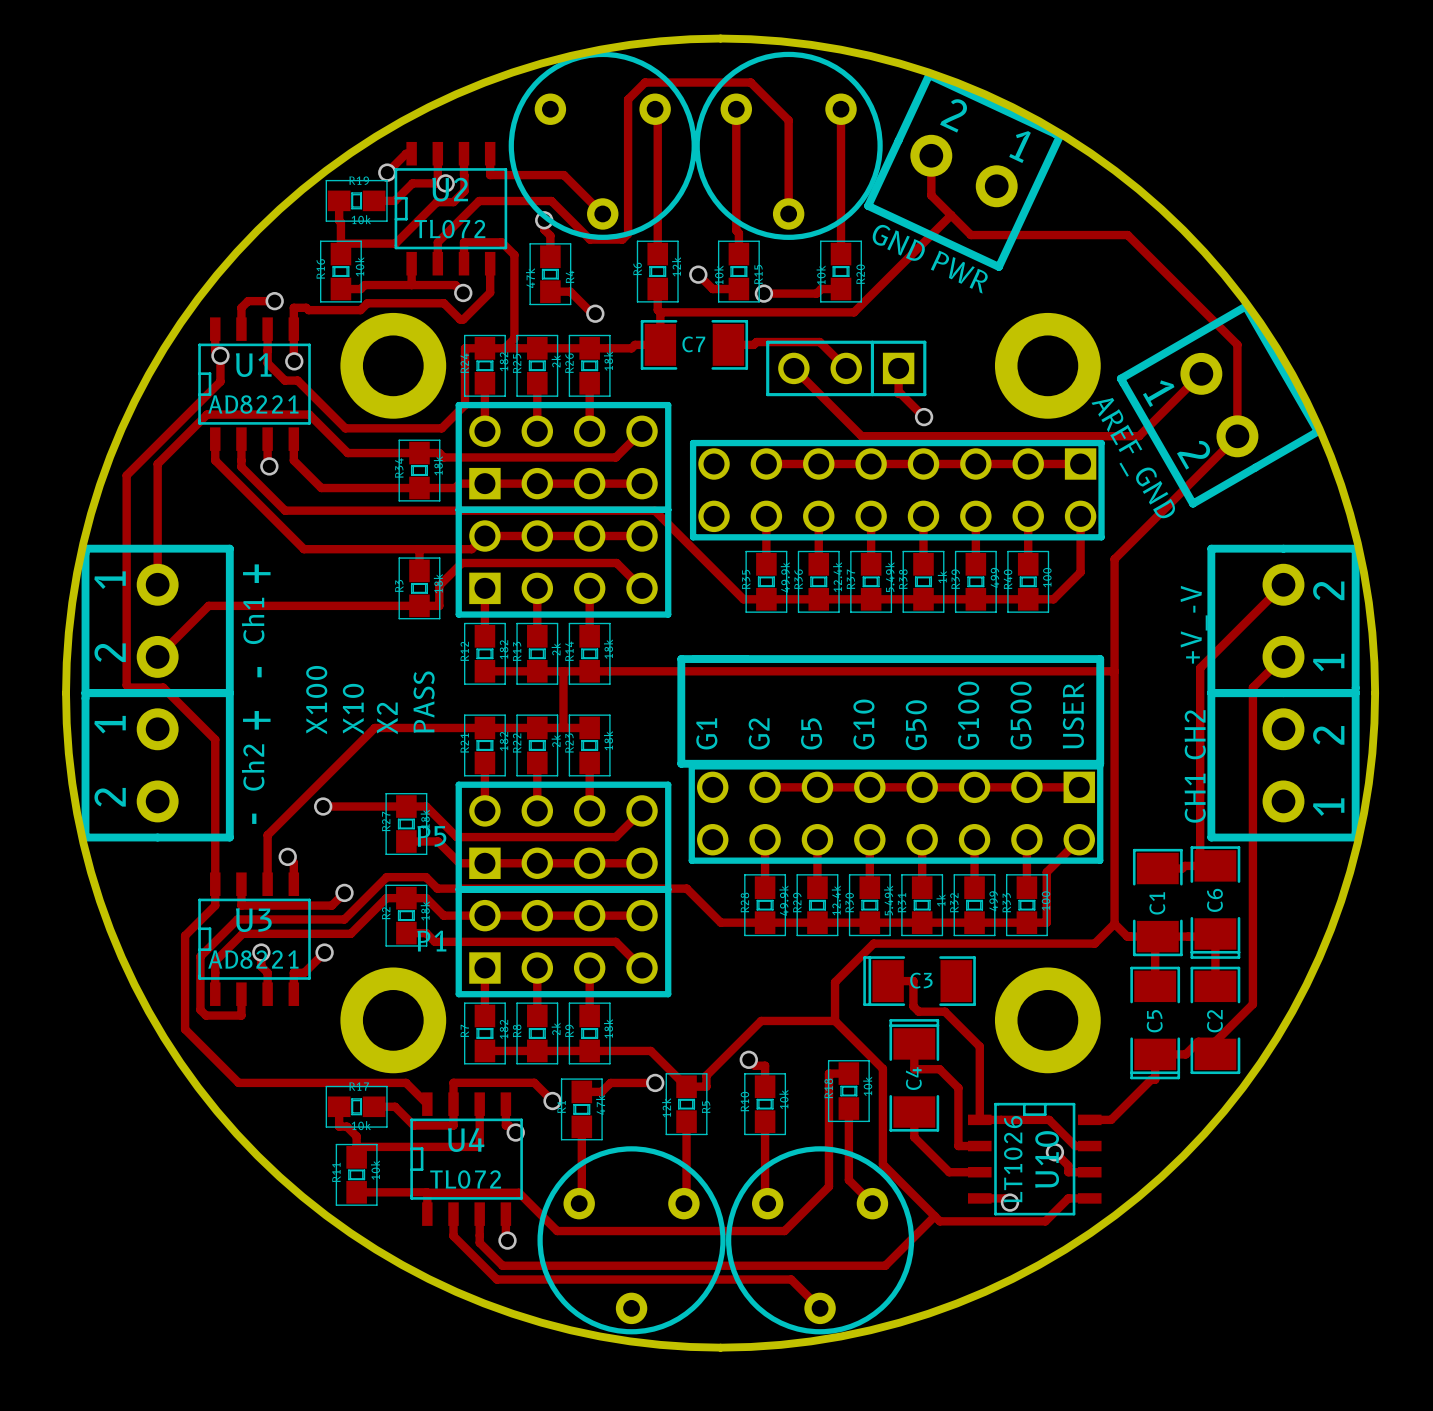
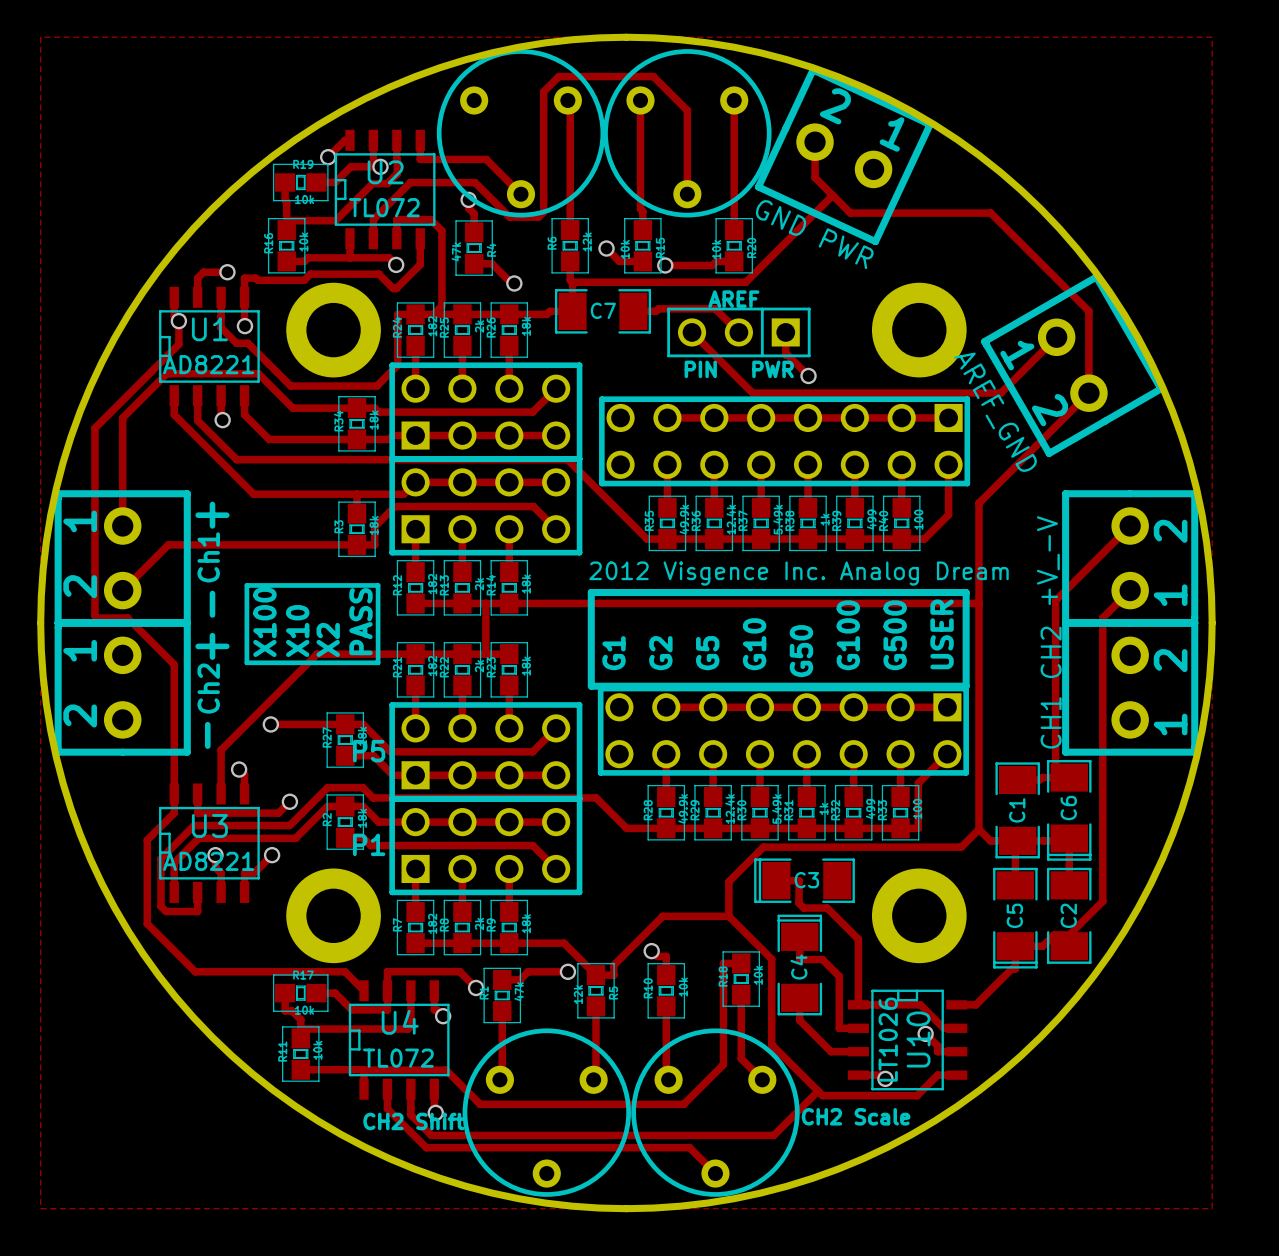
zone outline: none -> (40, 37) (1212, 37) (1212, 1208) (40, 1208) (40, 37)
text: none -> AREF (733, 299)
text: none -> PIN PWR (739, 369)
text: none -> 2012 Visgence Inc. Analog Dream (799, 573)
line: none -> (246, 585) (378, 585) (378, 662) (246, 662) (246, 585)
text: none -> CH2 Scale (856, 1116)
text: none -> CH2 Shift (413, 1121)

